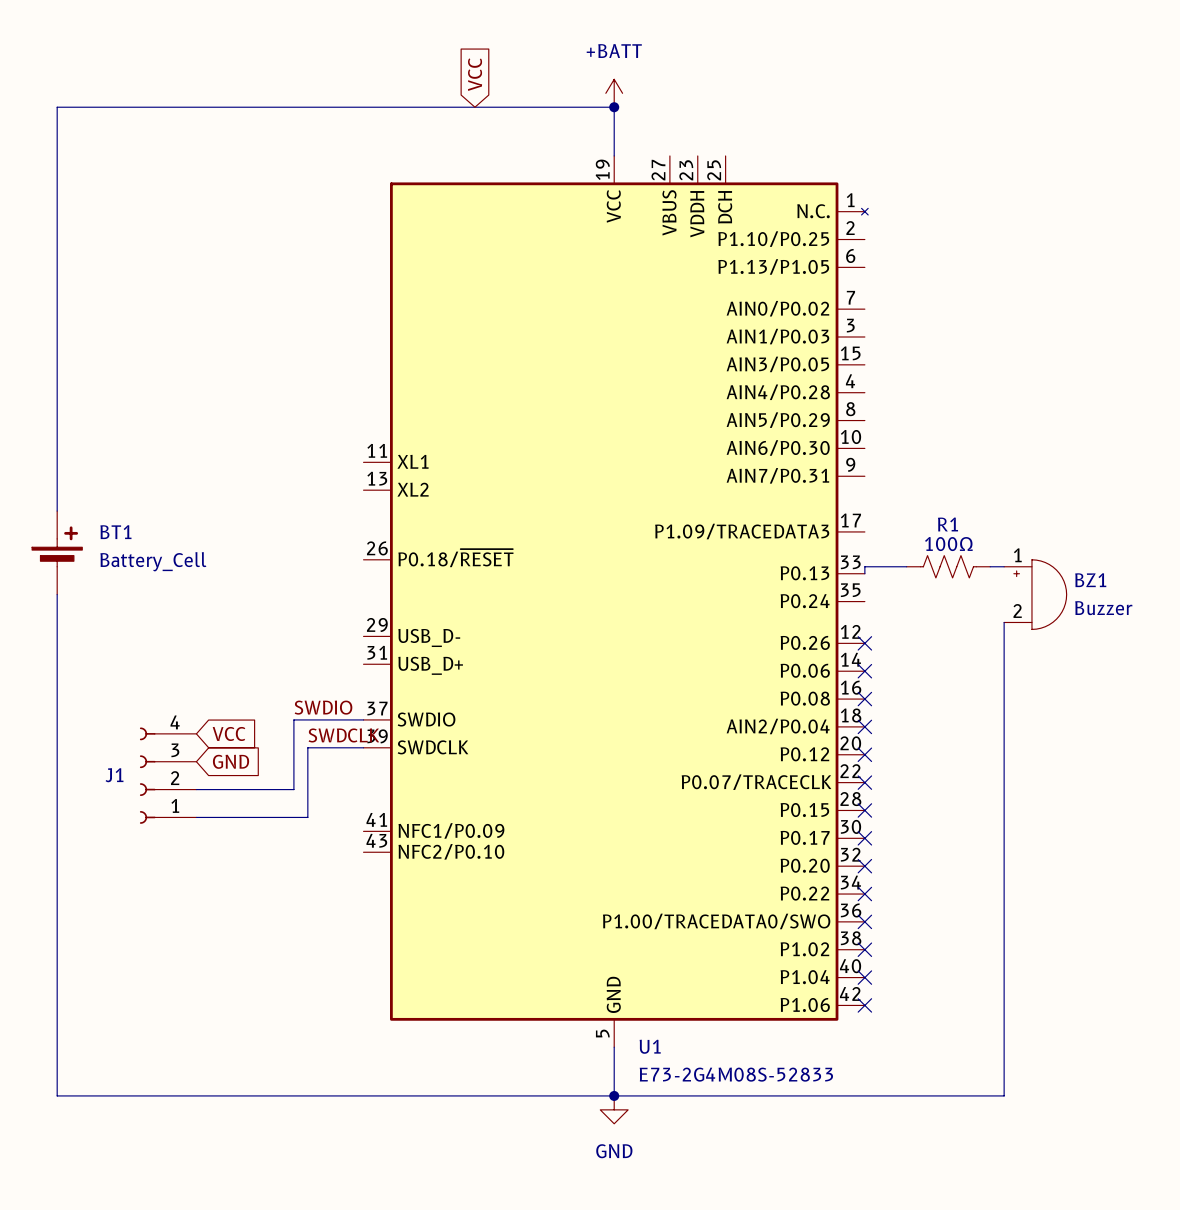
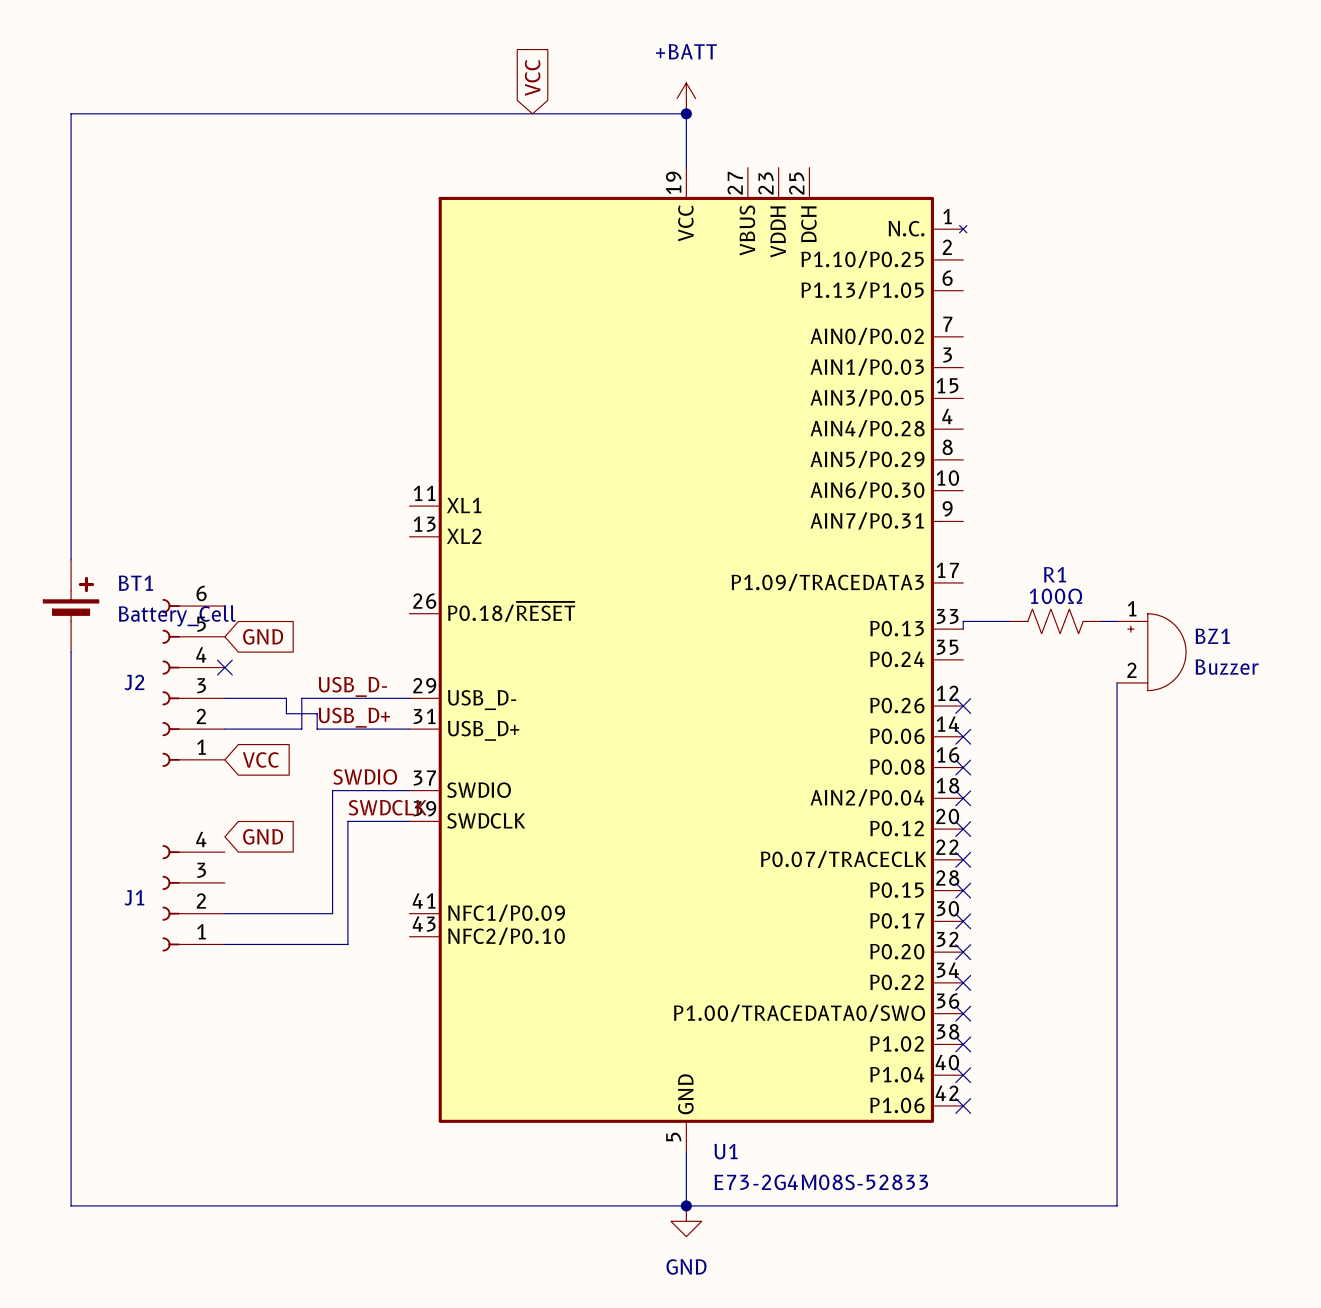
global label: none -> GND (263, 636)
no-connect mark: none -> (224, 667)
J2: none -> (193, 682)
label: none -> USB_D- (352, 686)
wire: none -> (224, 698) (286, 698) (286, 713) (317, 713) (317, 729) (409, 729)
wire: none -> (409, 698) (301, 698) (301, 729) (224, 729)
label: none -> USB_D+ (354, 717)
global label position: VCC (229, 733) -> VCC (260, 759)
J1 position: (168, 775) -> (193, 898)
wire: (196, 789) (293, 789) -> (224, 913) (332, 913) (332, 867)
wire: (196, 817) (307, 817) -> (224, 944) (347, 944) (347, 898)

